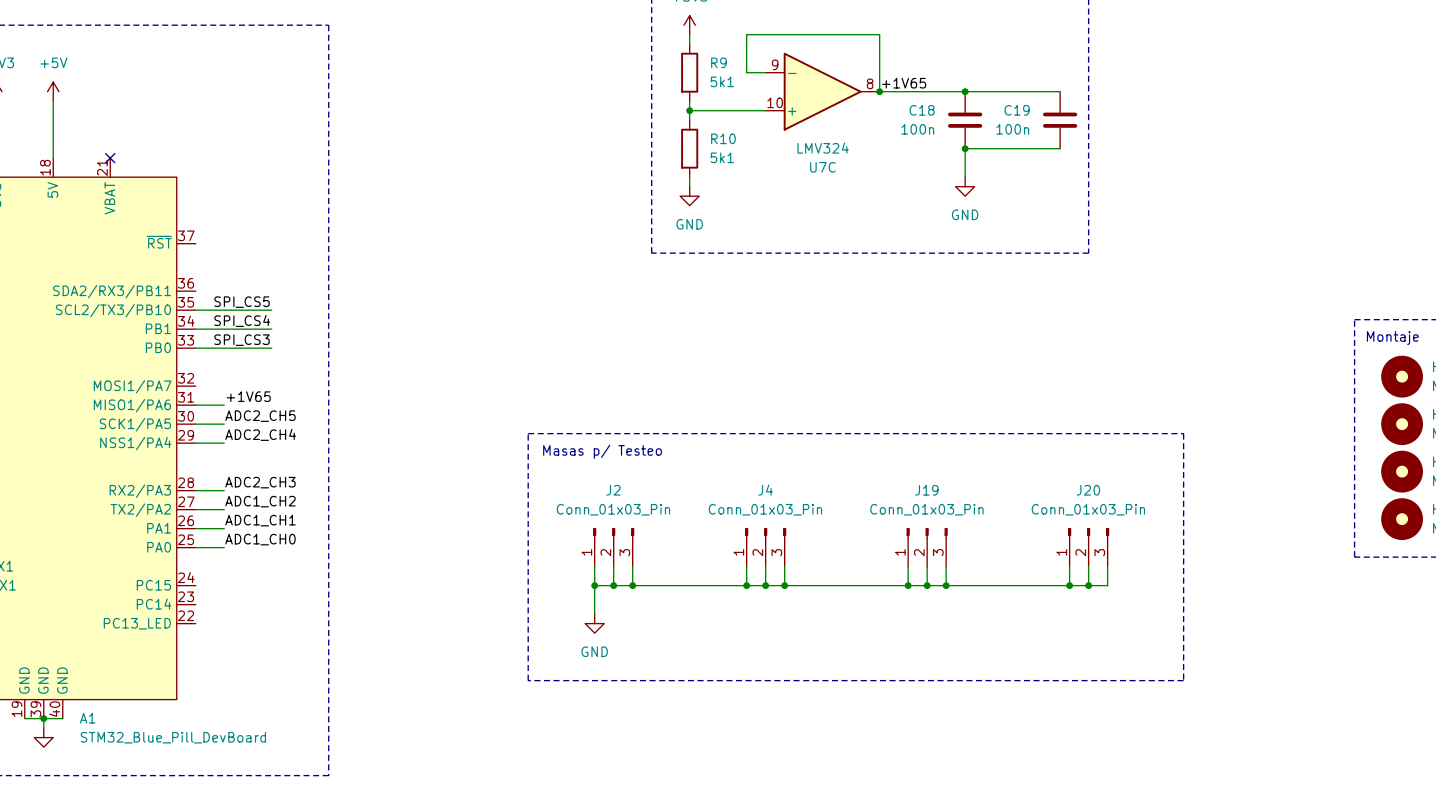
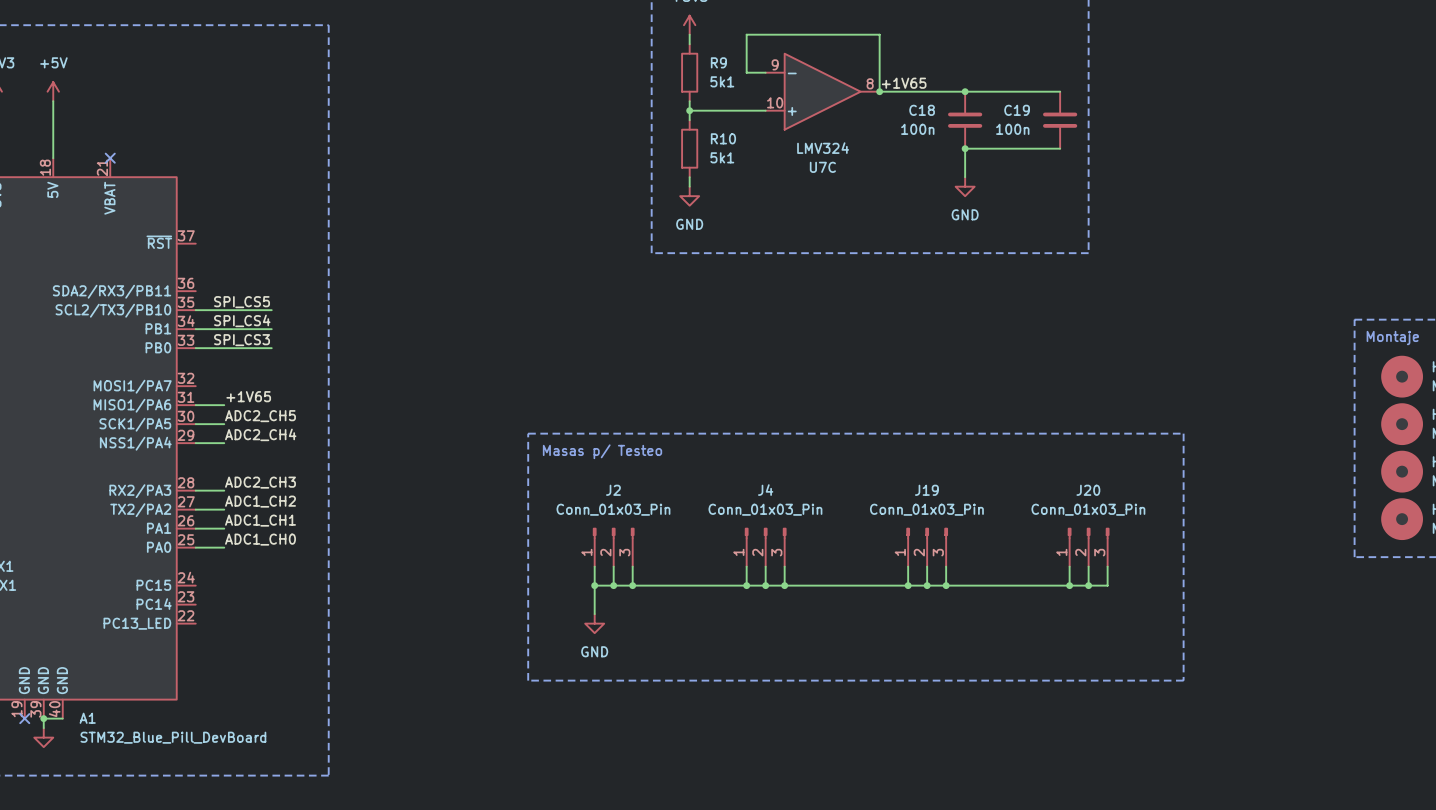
wire: (24, 718) (43, 718) -> none
no-connect mark: none -> (24, 718)

